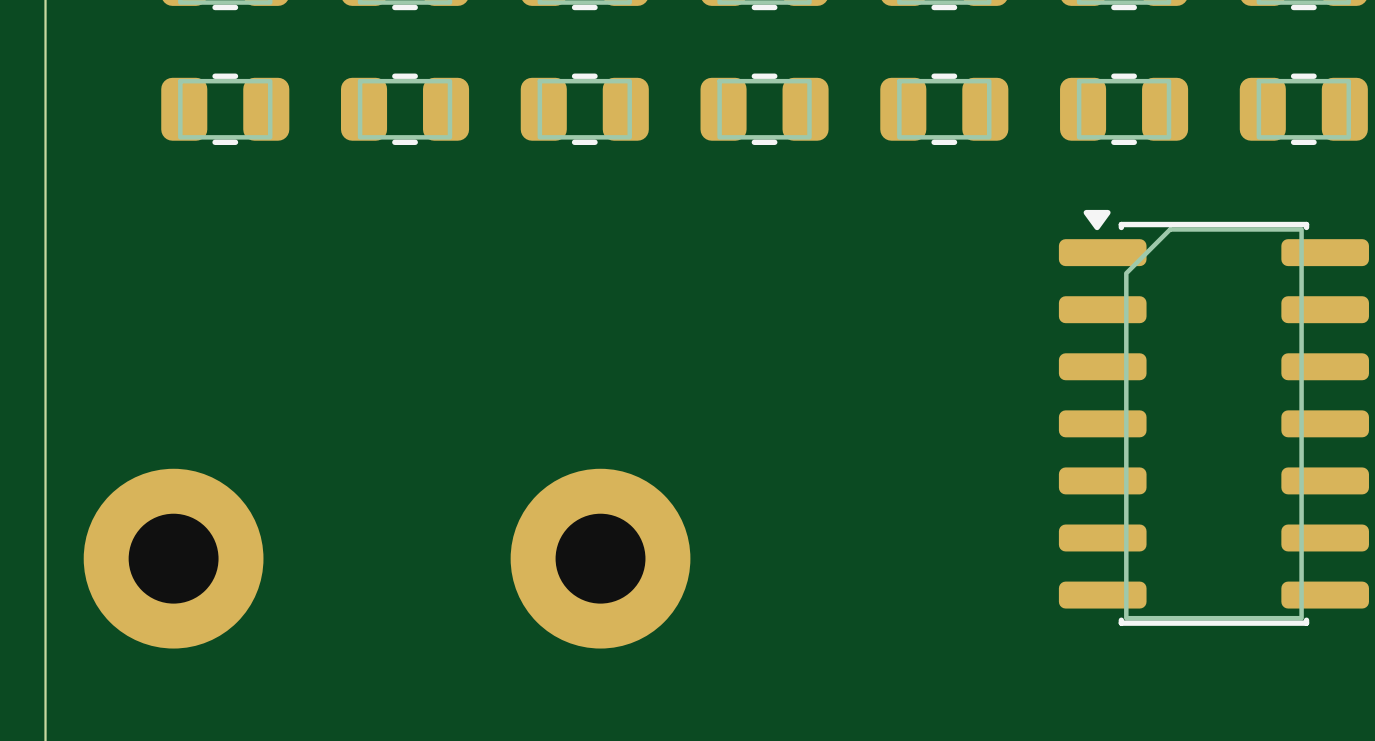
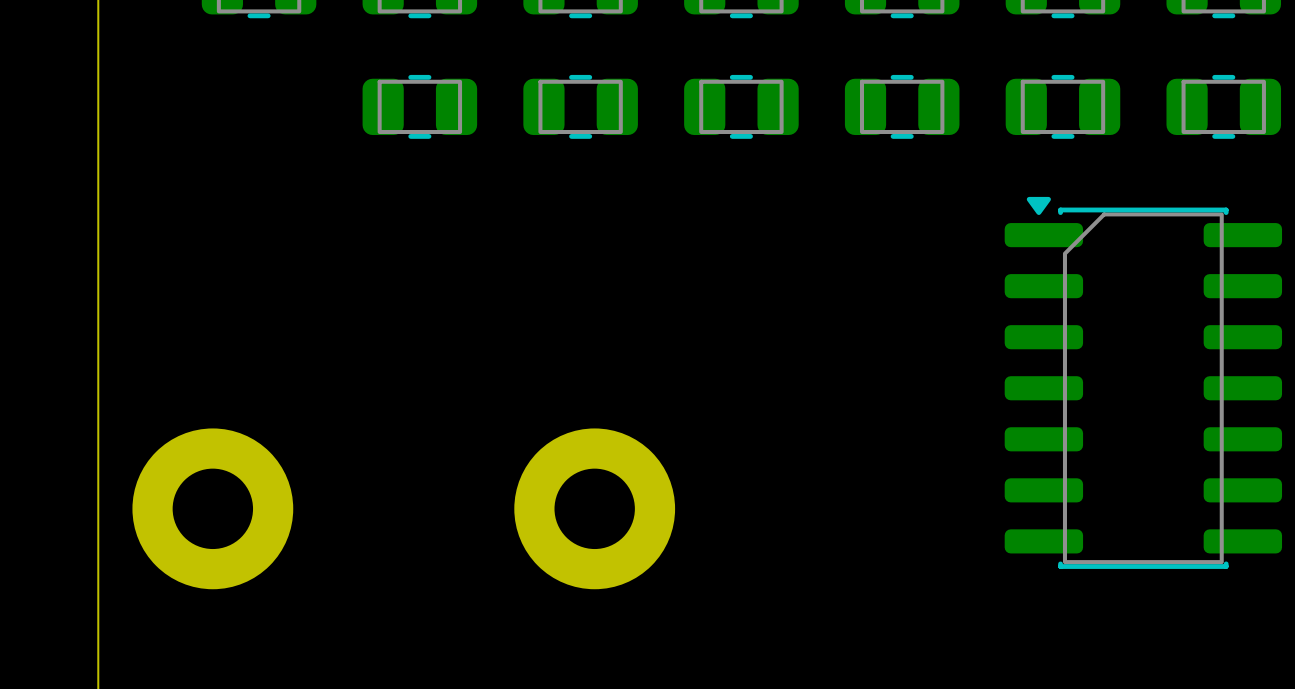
part: (225, 109) -> none

